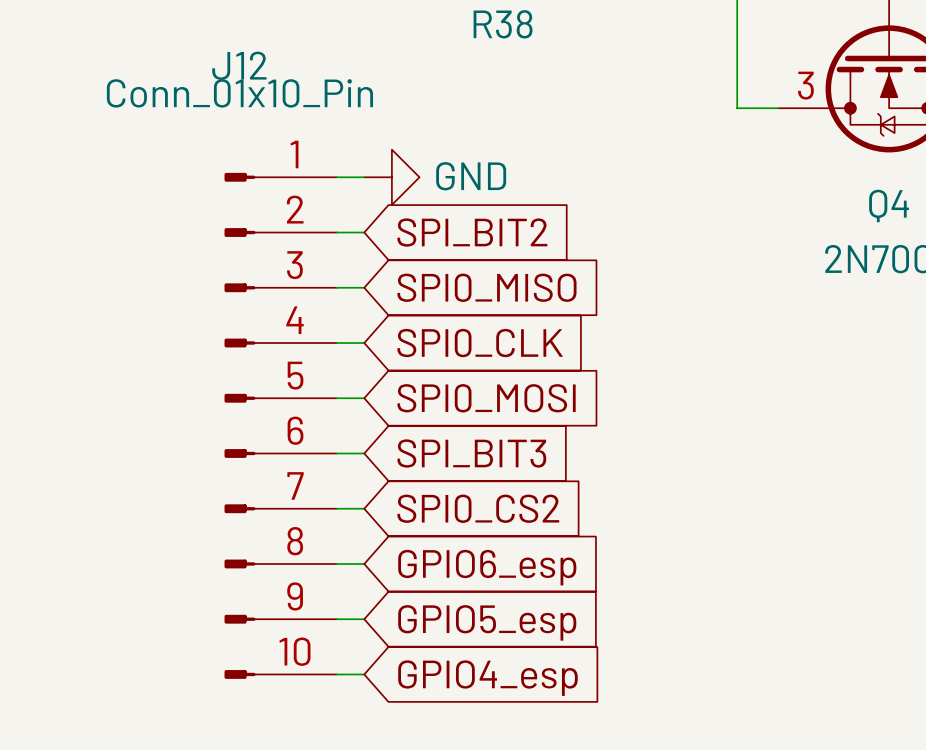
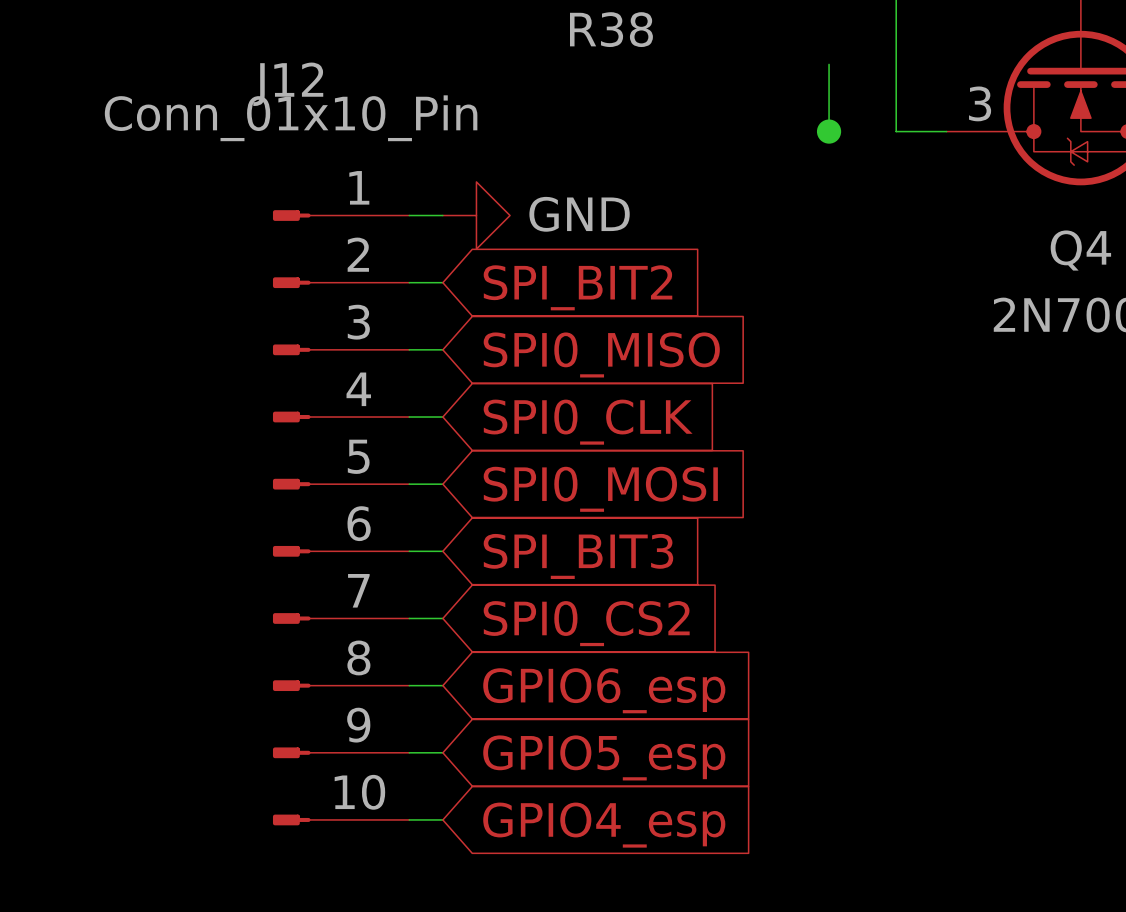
wire: none -> (829, 64) (829, 131)
junction: none -> (829, 131)

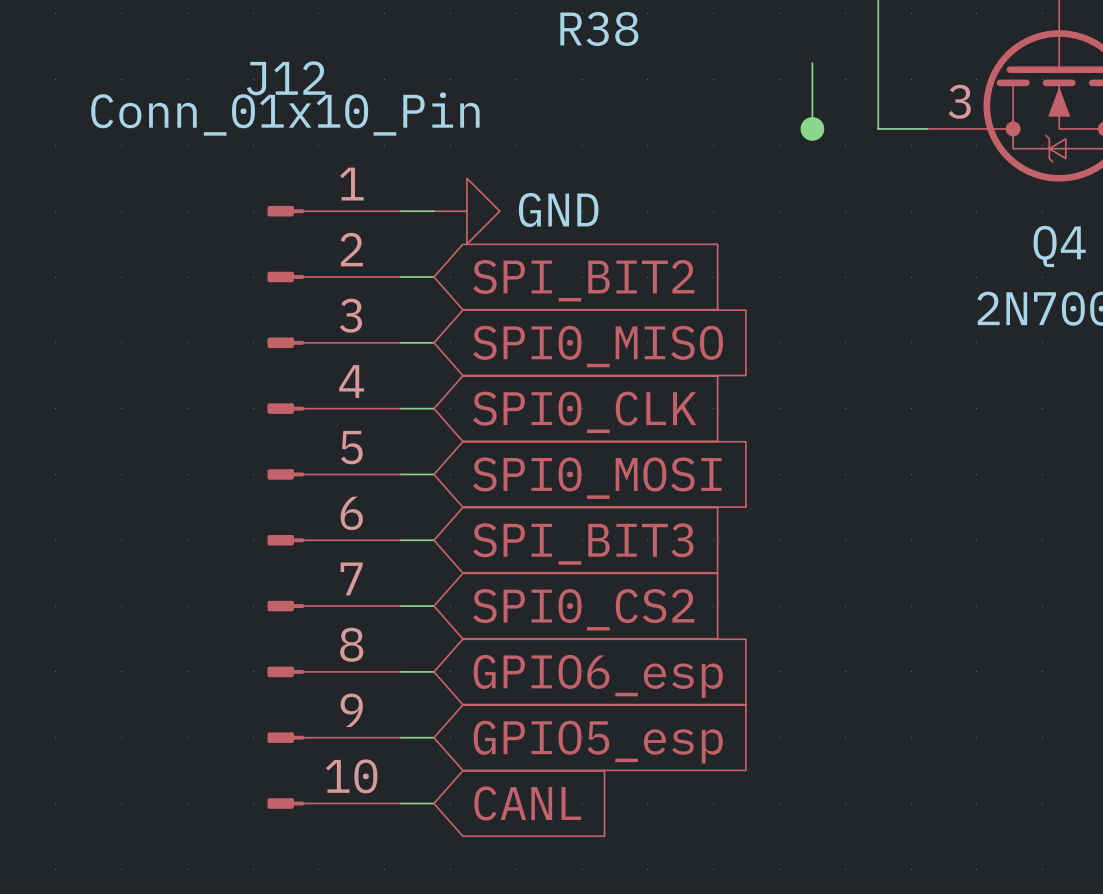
global label: GPIO4_esp (604, 825) -> CANL (527, 803)

